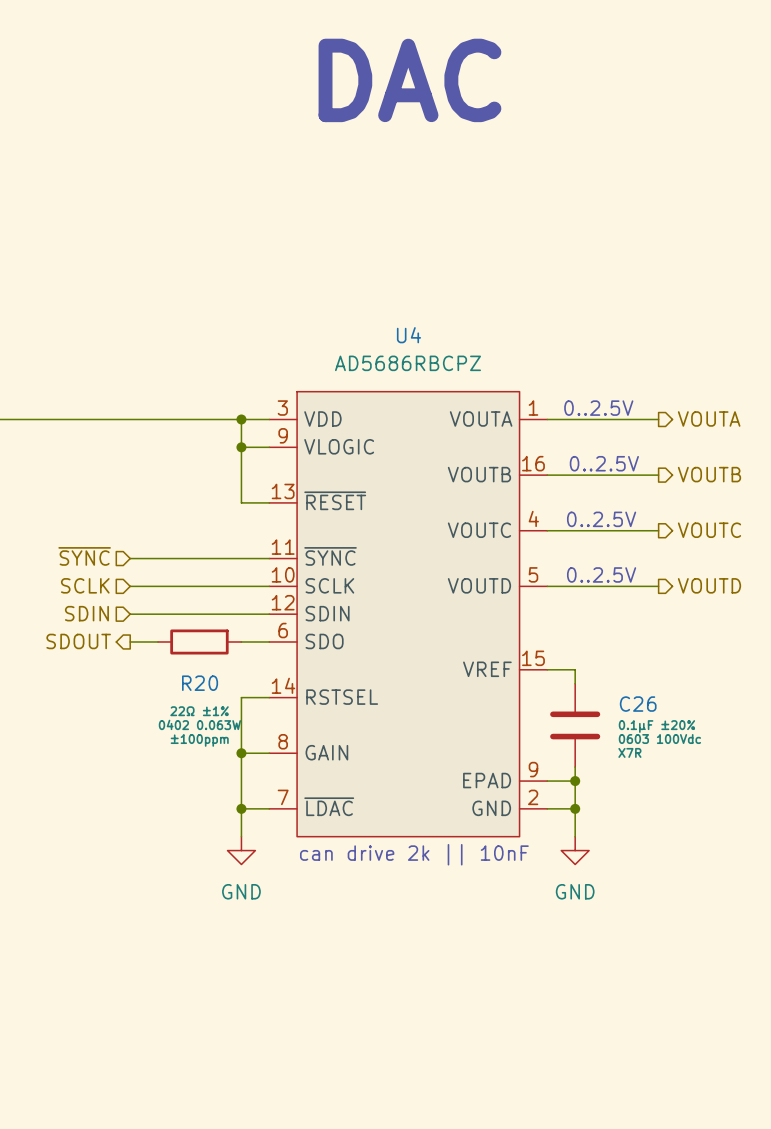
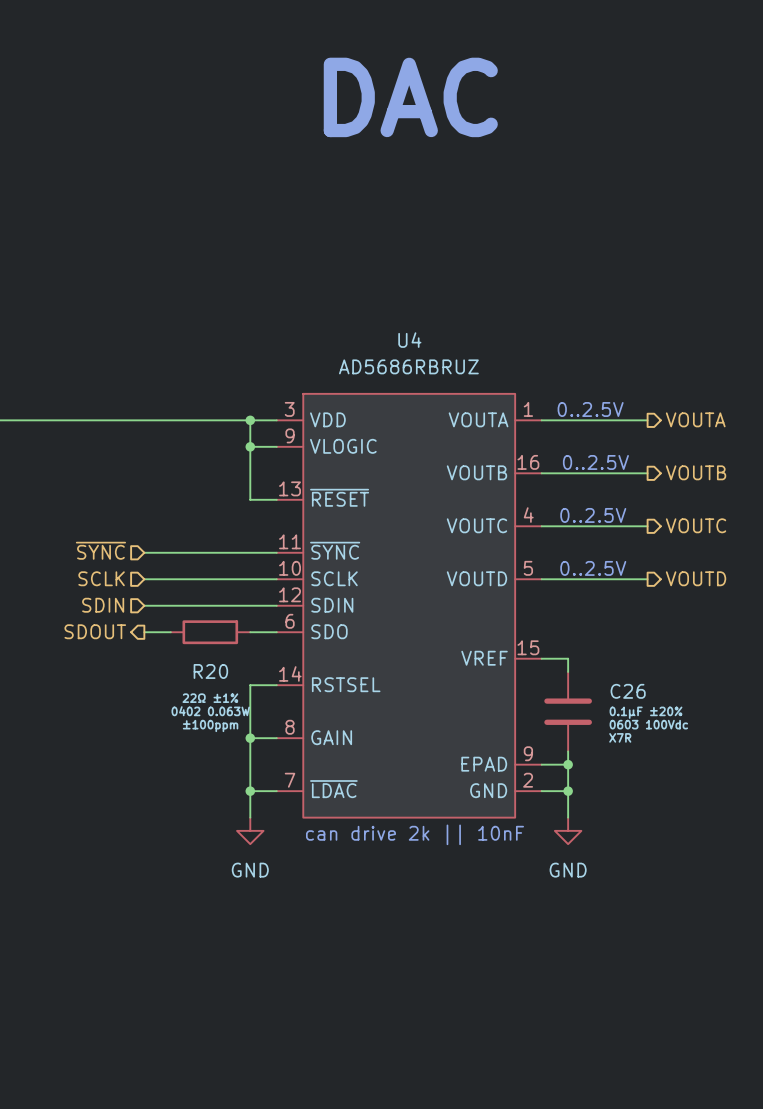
U4 value: AD5686RBCPZ (407, 363) -> AD5686RBRUZ (408, 366)

